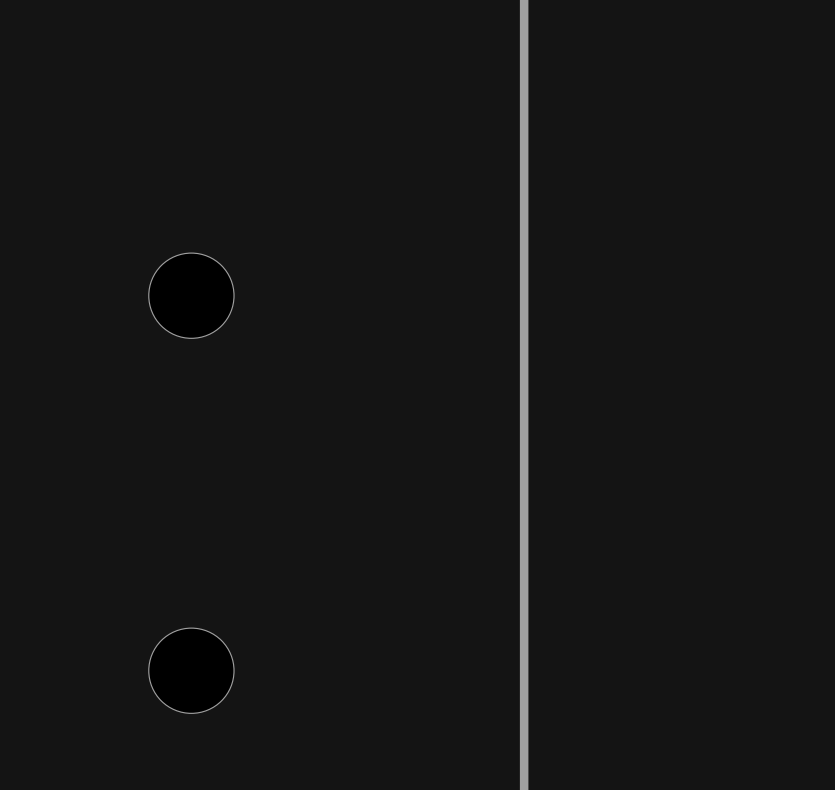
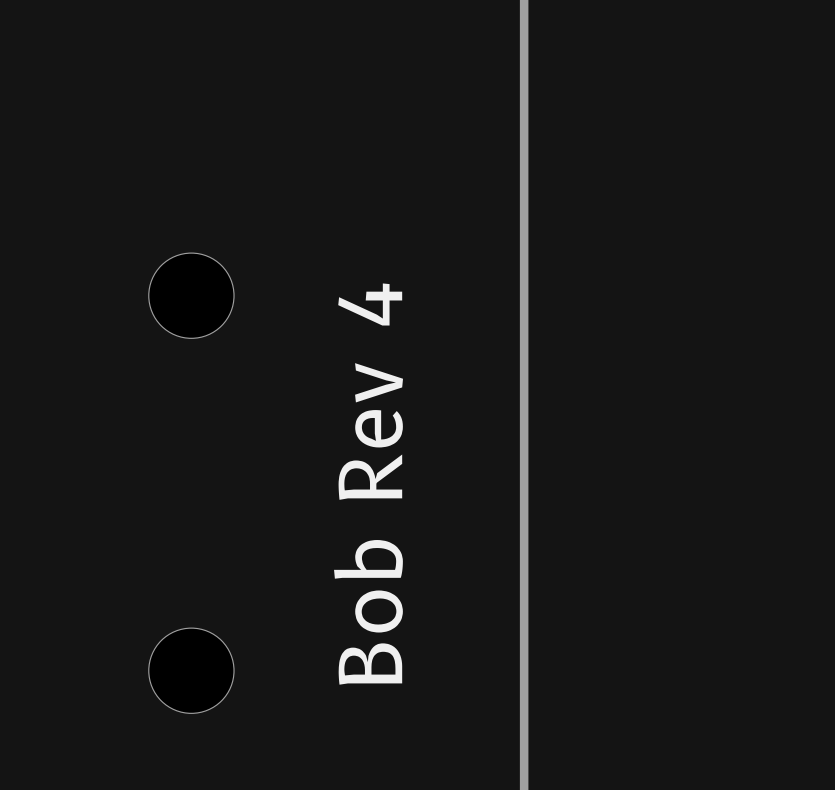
text: none -> Bob Rev 4 (368, 484)

